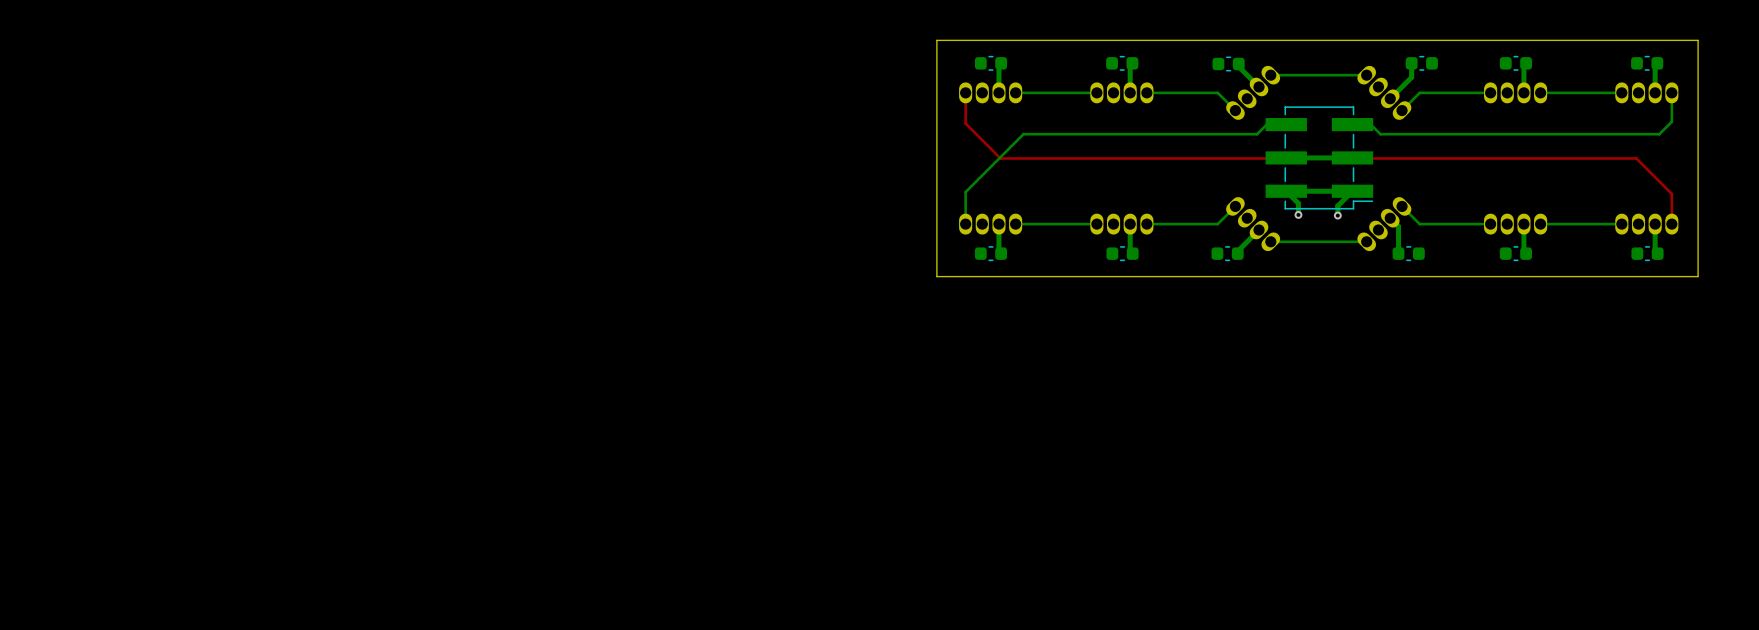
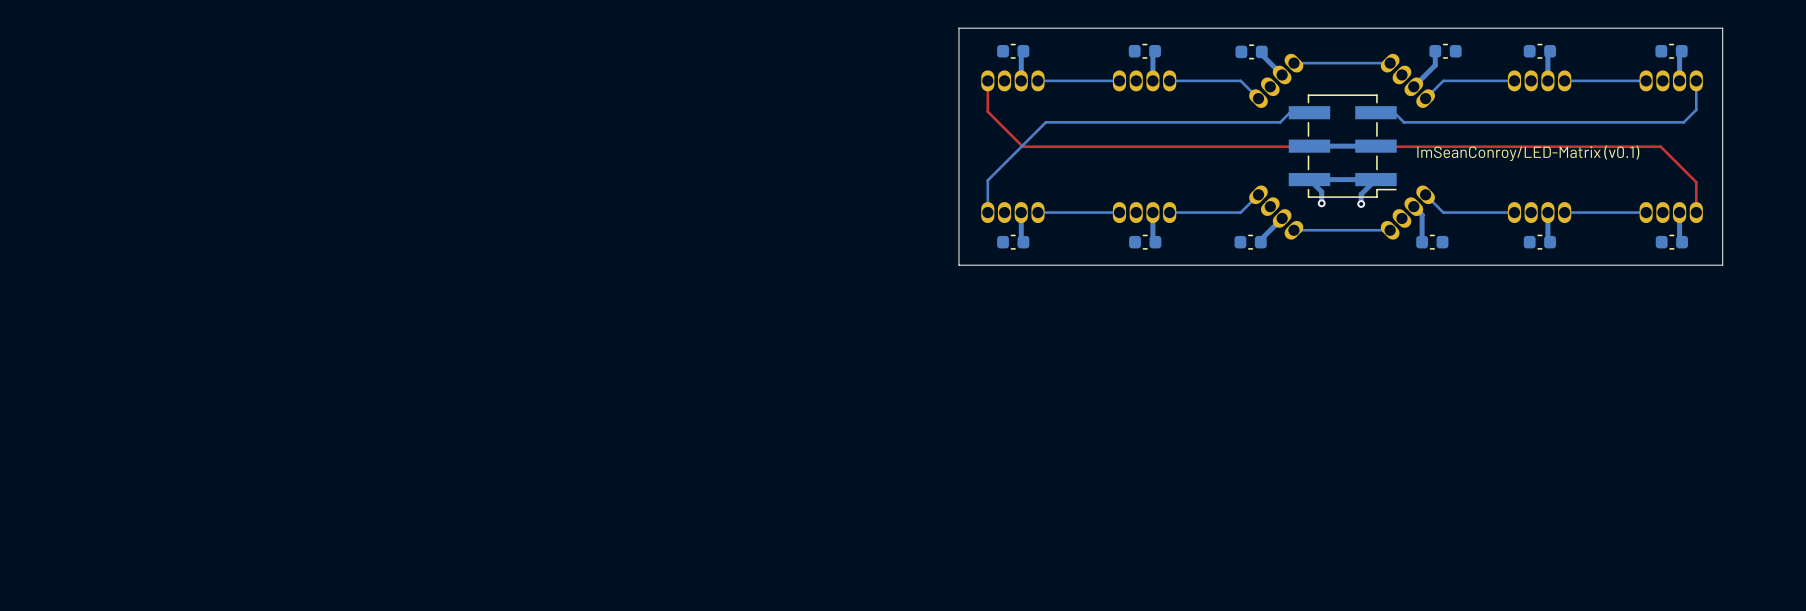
text: none -> ImSeanConroy/LED-Matrix (v0.1) (1528, 153)

